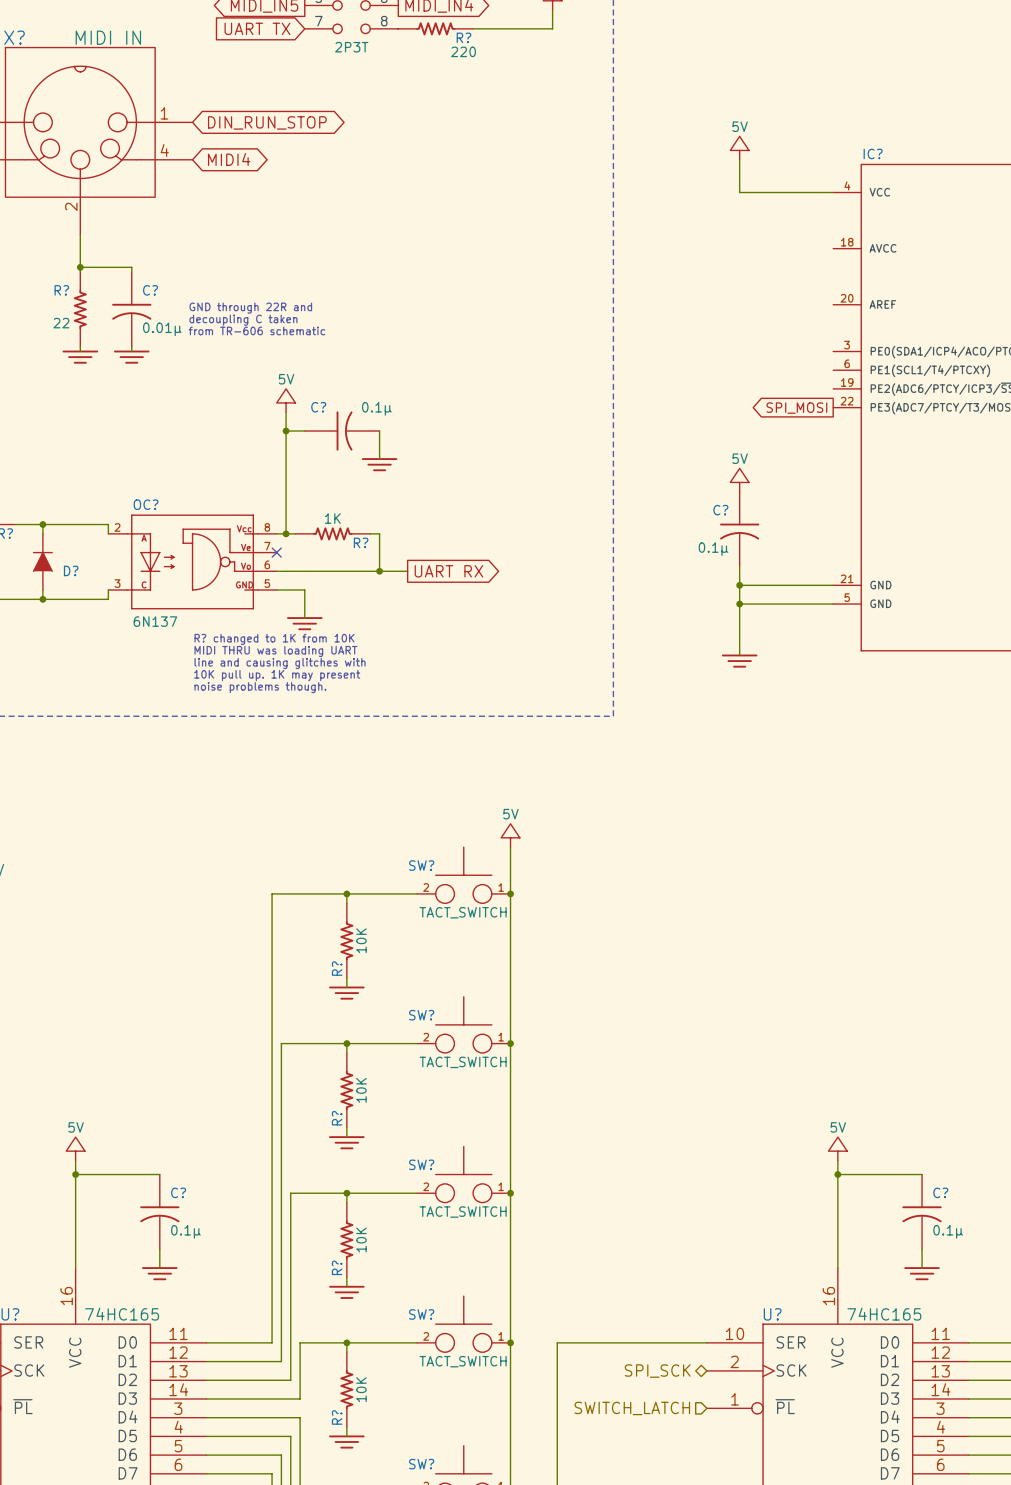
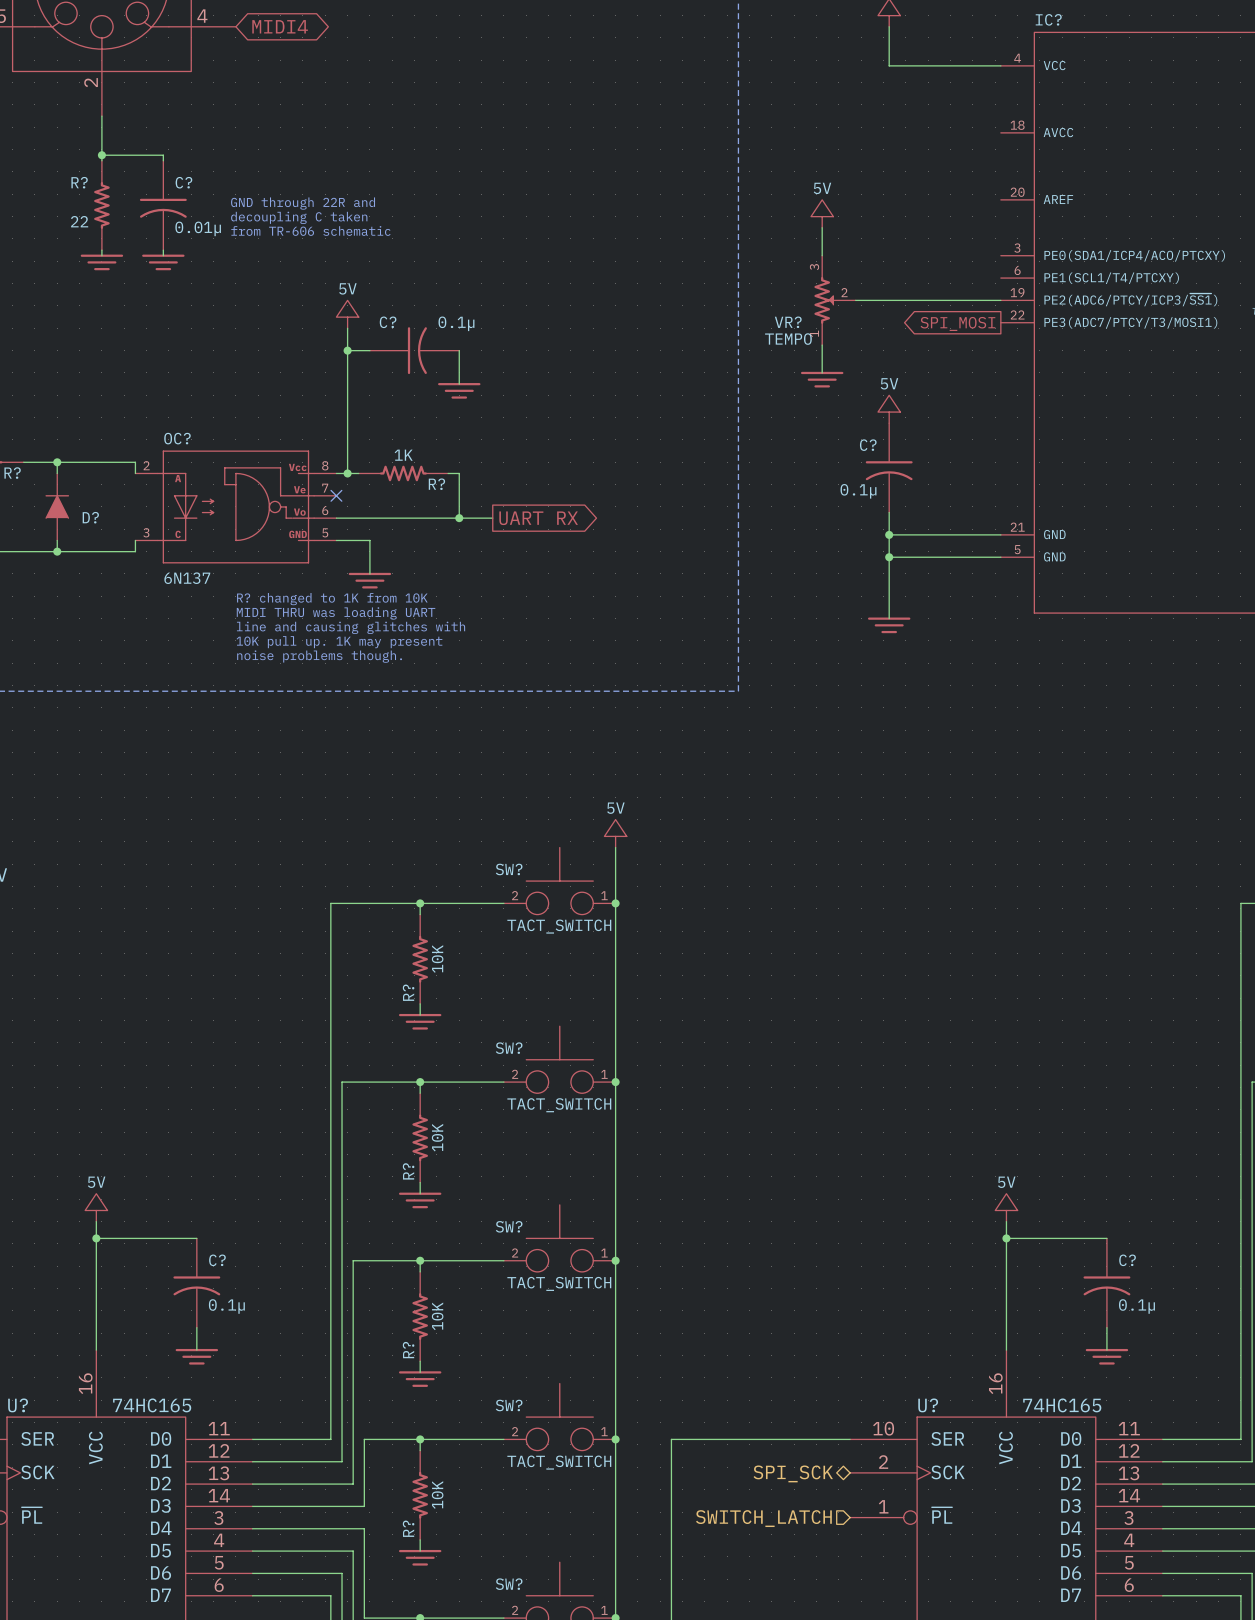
power symbol: none -> 5V (822, 213)
wire: none -> (822, 227) (822, 255)
VR?: none -> TEMPO (835, 300)
wire: none -> (855, 300) (1000, 300)
wire: none -> (822, 345) (822, 372)
power symbol: none -> (822, 379)

